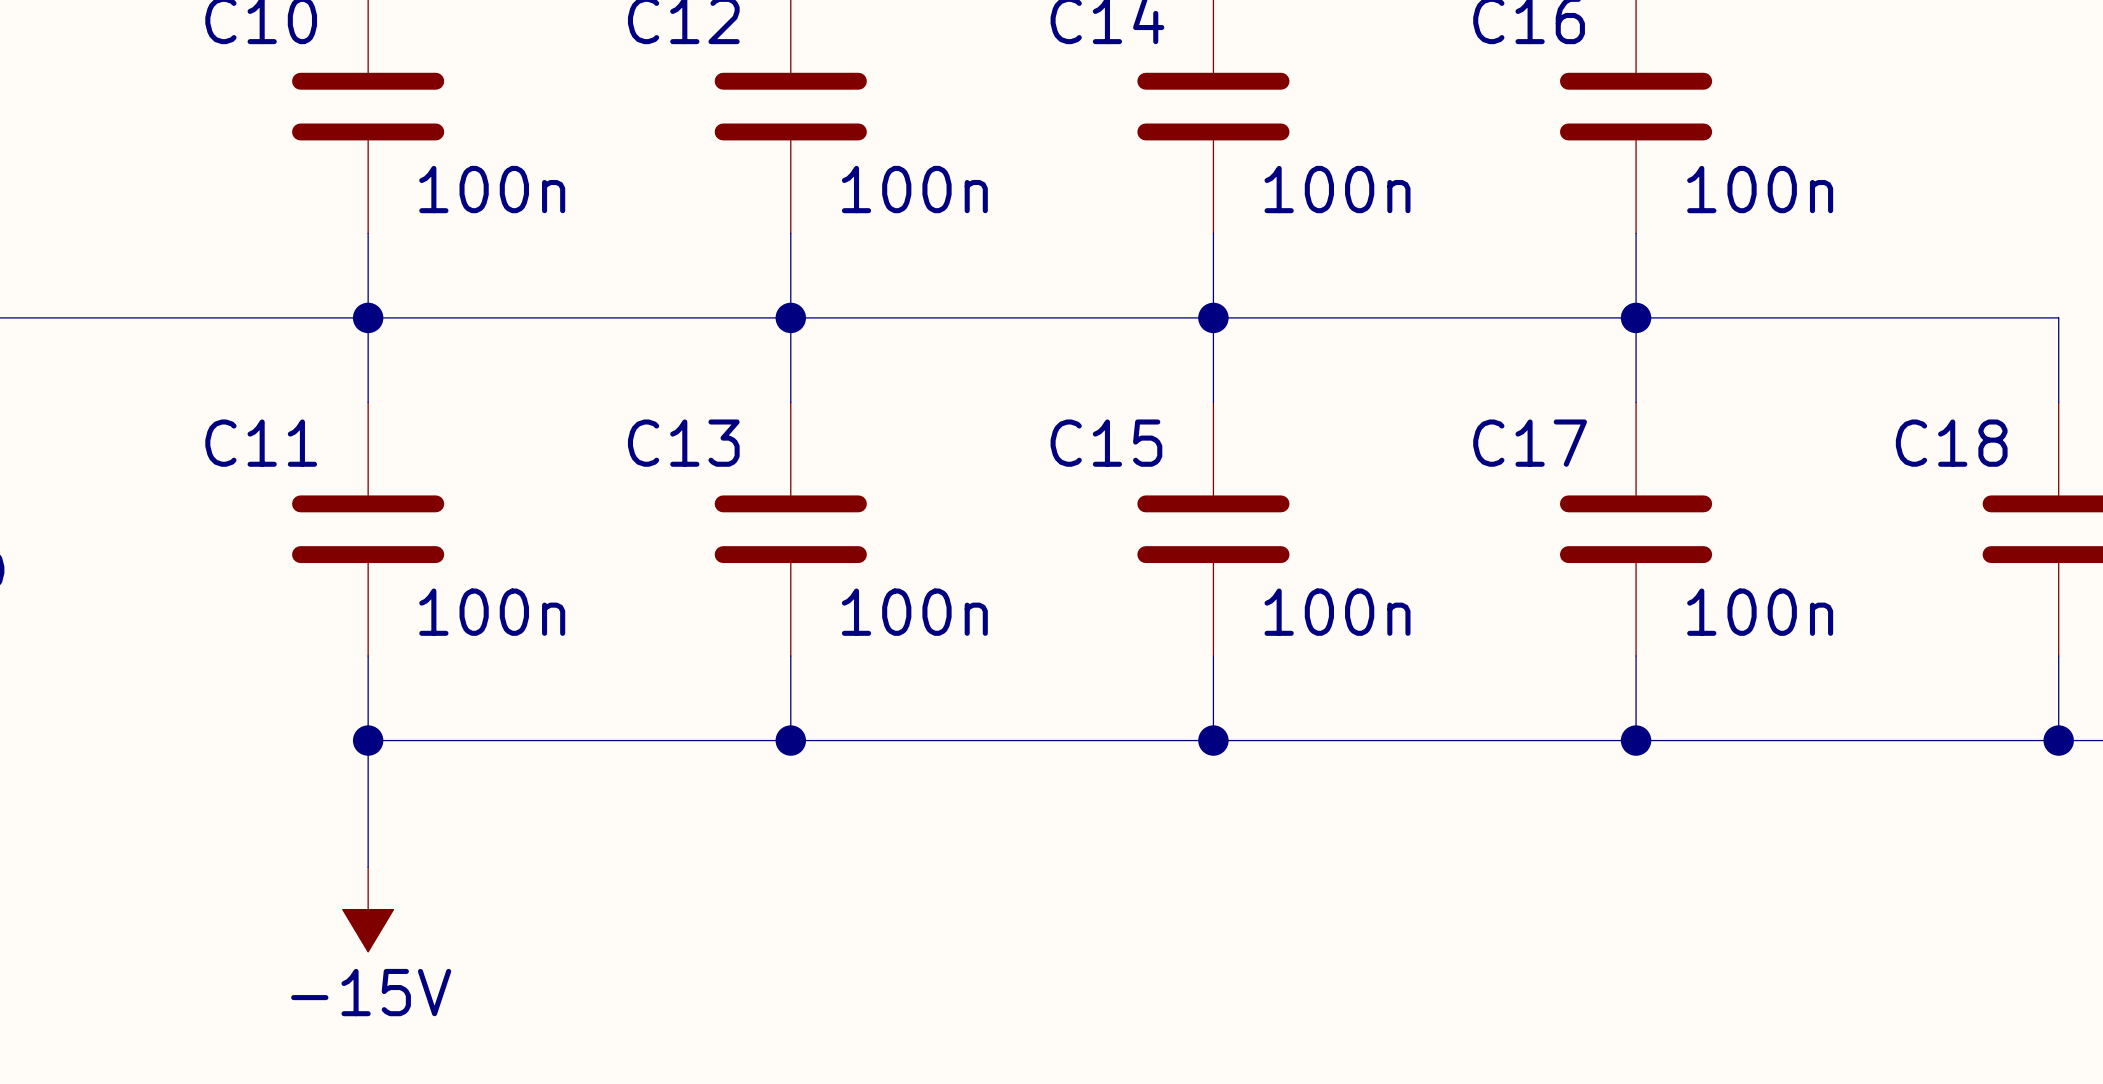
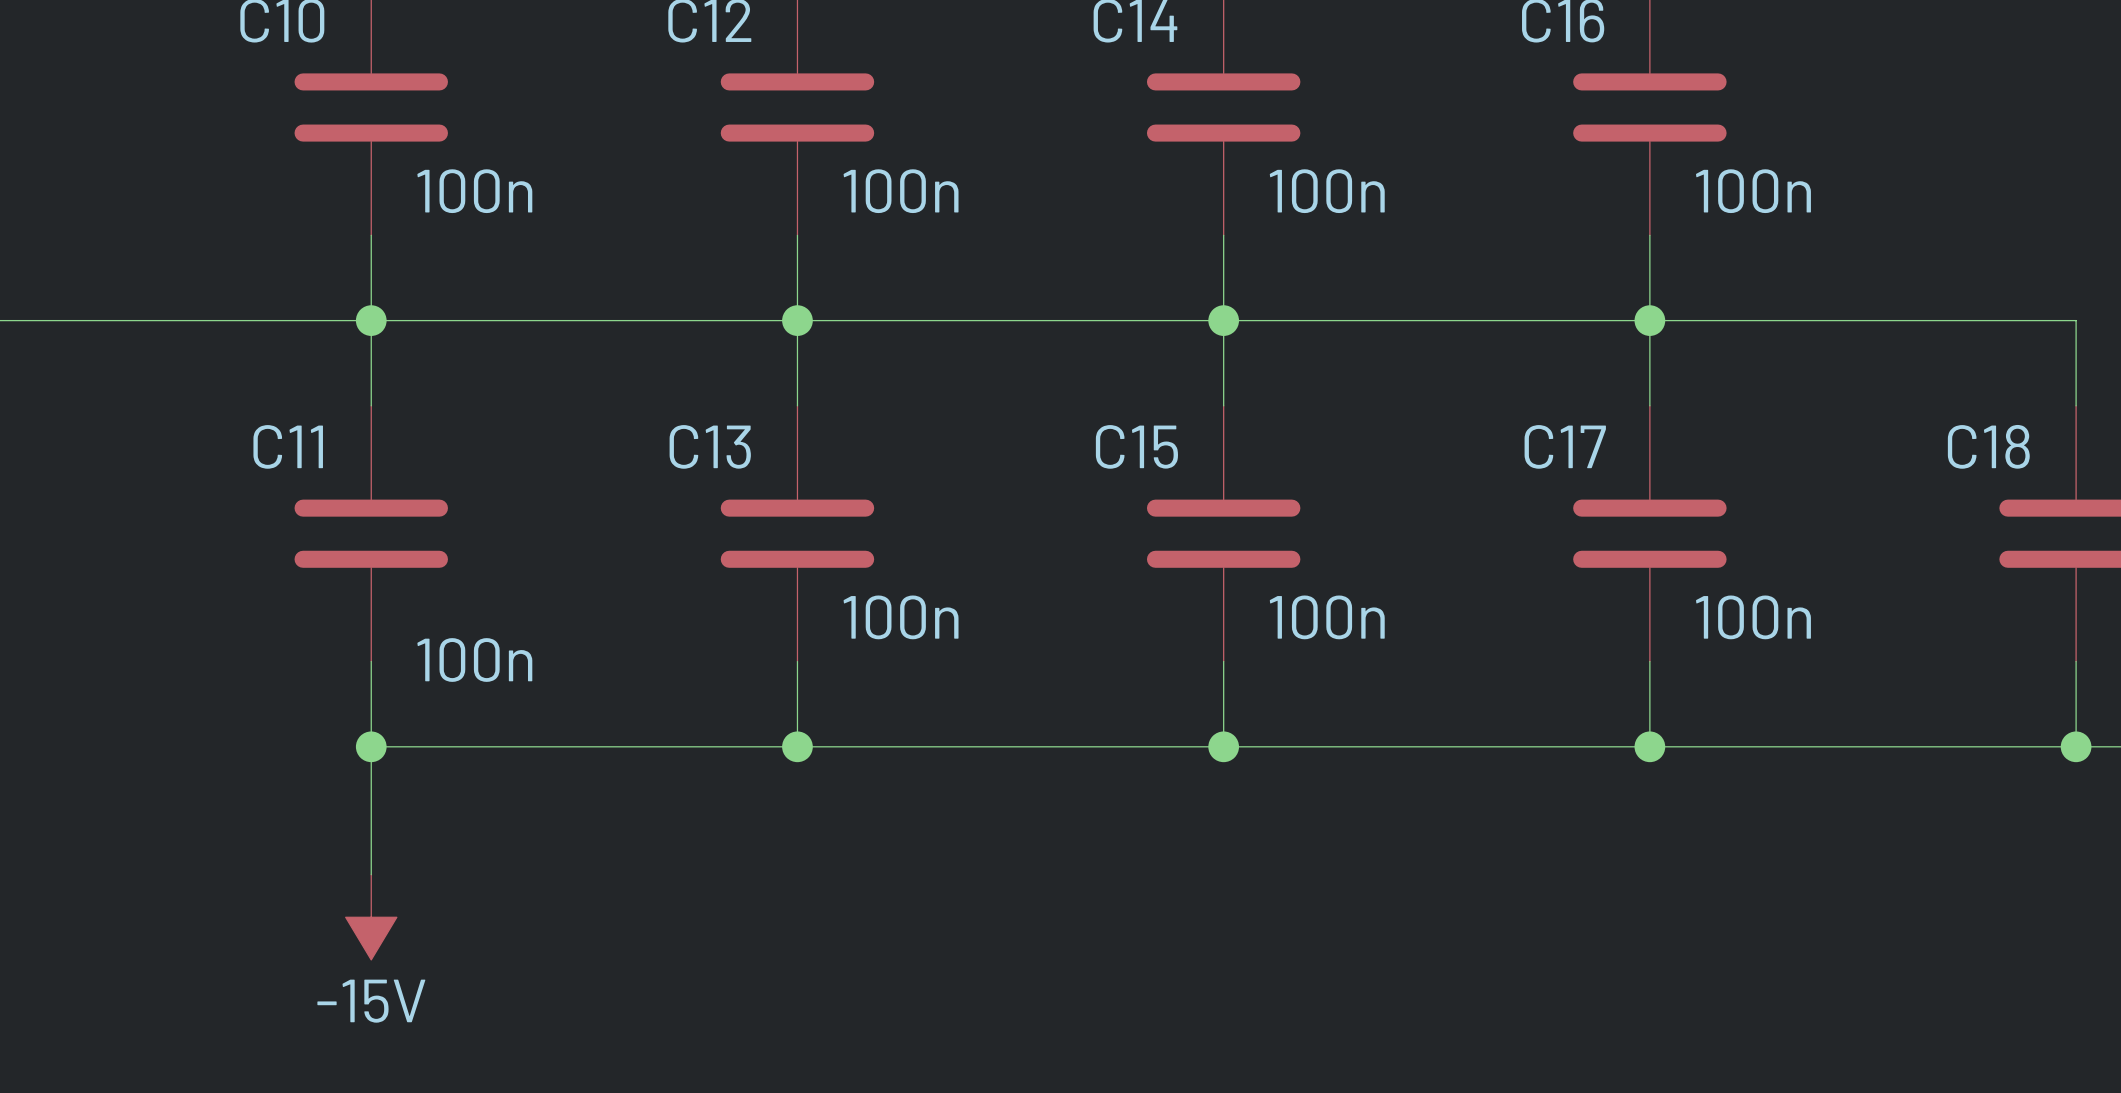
C11 value position: 100n (492, 612) -> 100n (474, 660)

